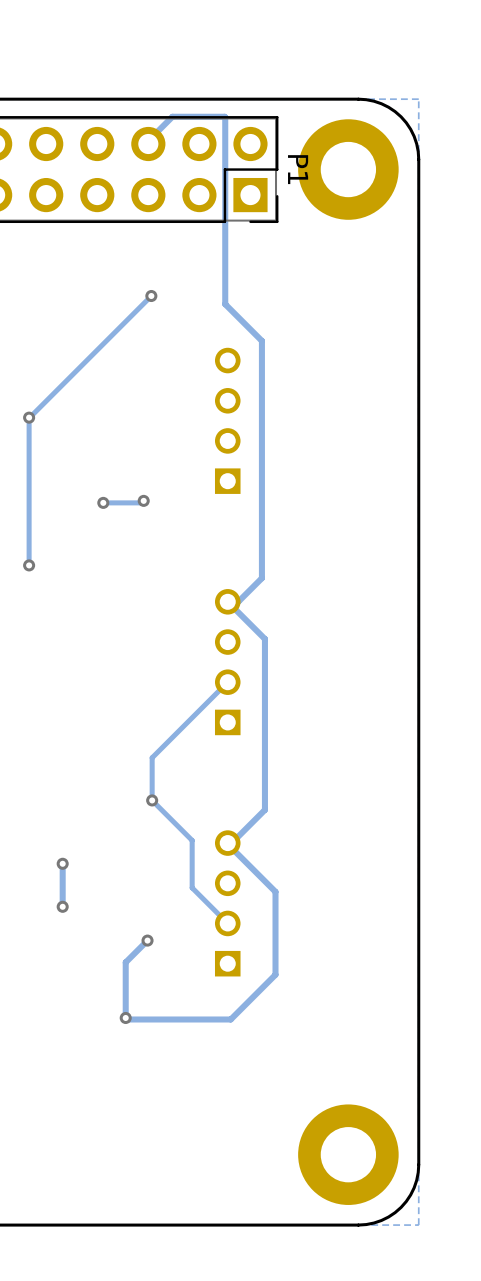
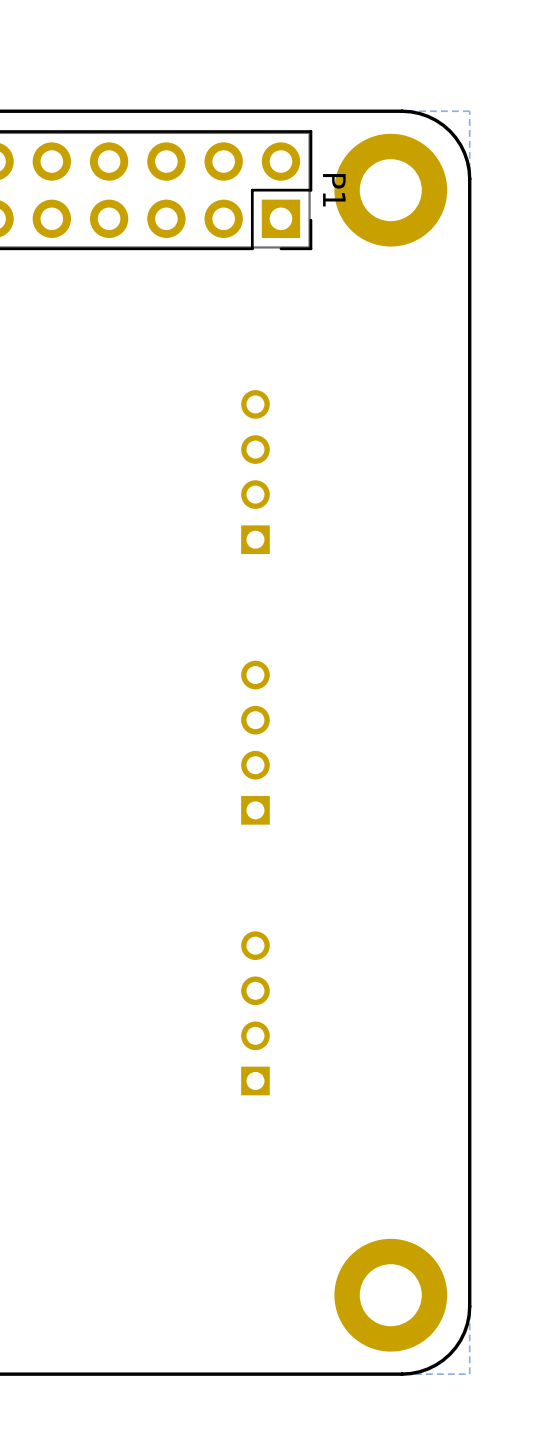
track: (148, 144) (148, 140) (172, 116) (225, 117) (225, 304) (261, 340) (261, 578) (238, 601) (227, 601) (264, 639) (264, 809) (231, 843) (227, 844) (275, 891) (275, 974) (230, 1019) (127, 1019) (125, 962) (147, 940) -> none
track: (151, 296) (29, 417) (29, 565) -> none
via: (151, 296) -> none
via: (29, 417) -> none
track: (143, 500) (141, 502) (103, 502) -> none
via: (143, 500) -> none
via: (103, 502) -> none
via: (29, 565) -> none
track: (227, 682) (152, 757) (152, 800) (192, 840) (192, 887) (227, 923) -> none
via: (152, 800) -> none
track: (62, 863) (62, 906) -> none
via: (62, 863) -> none
via: (62, 906) -> none
via: (147, 940) -> none
via: (125, 1017) -> none

